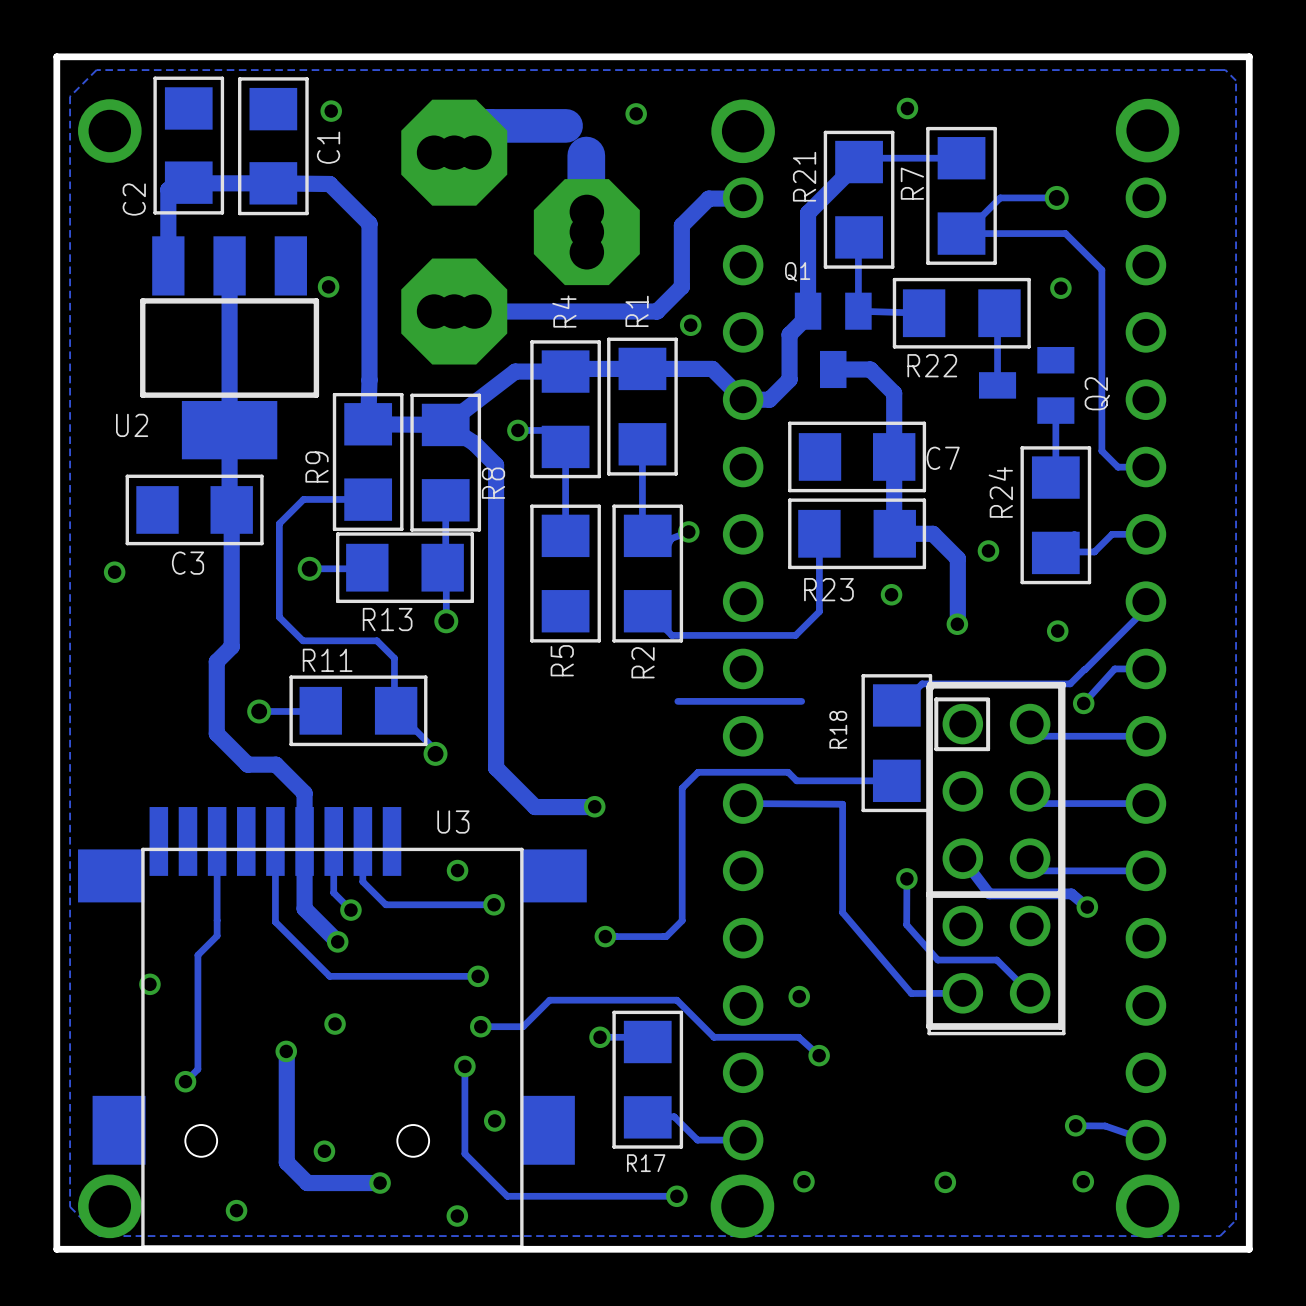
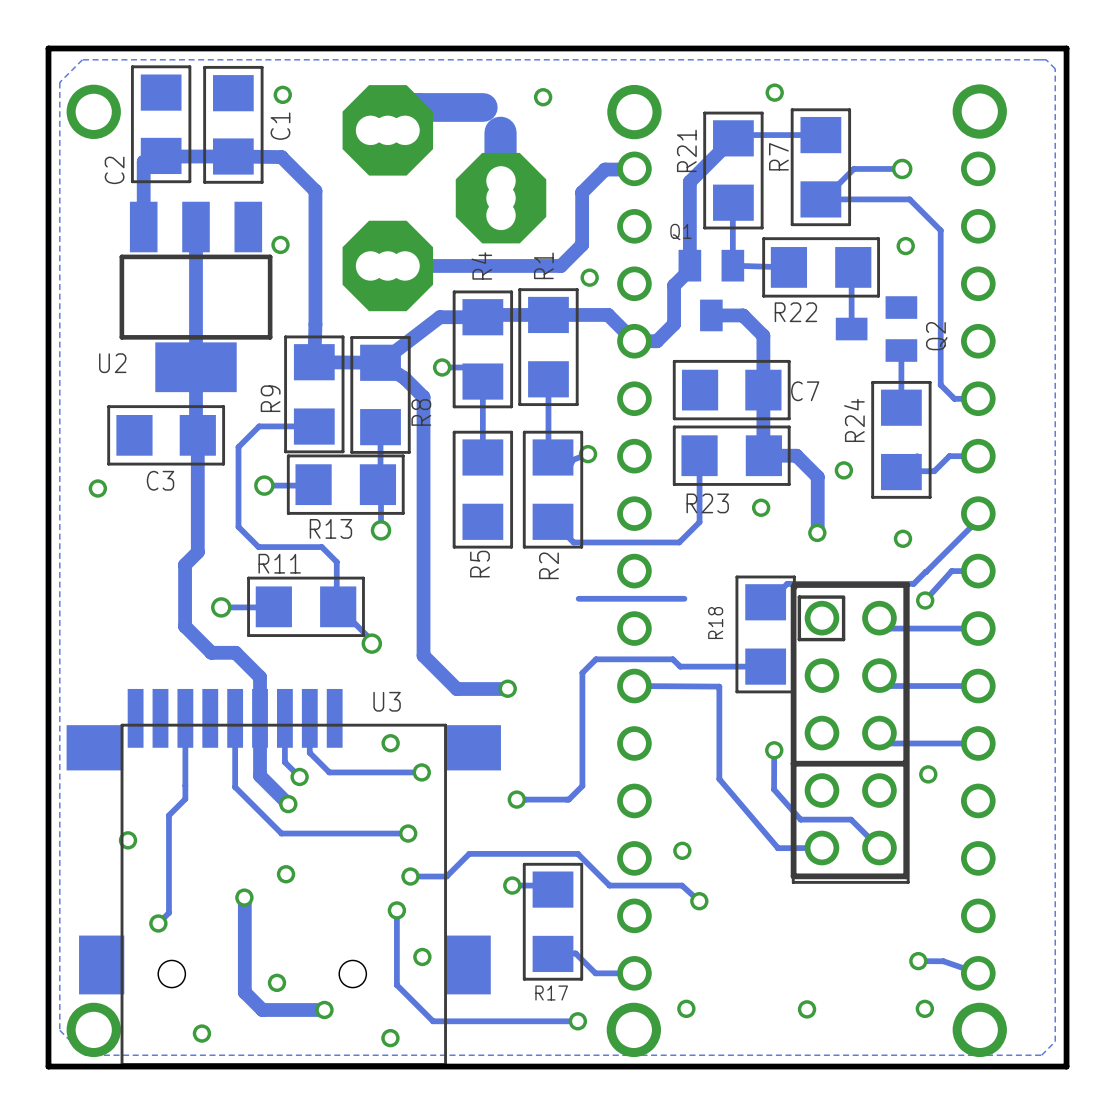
track: (962, 858) (989, 893) (1071, 893) (1087, 907) -> none

